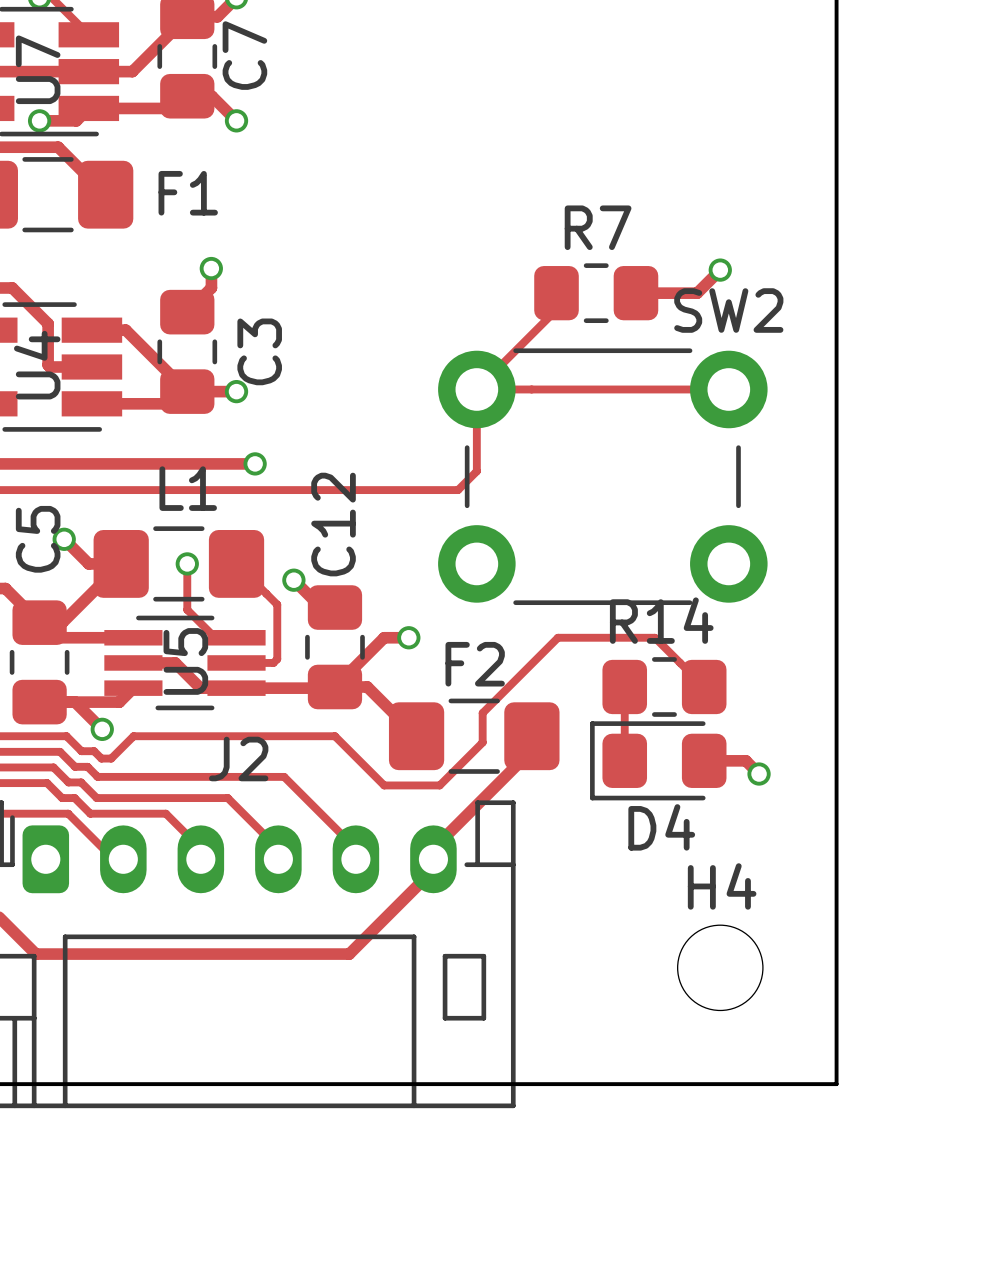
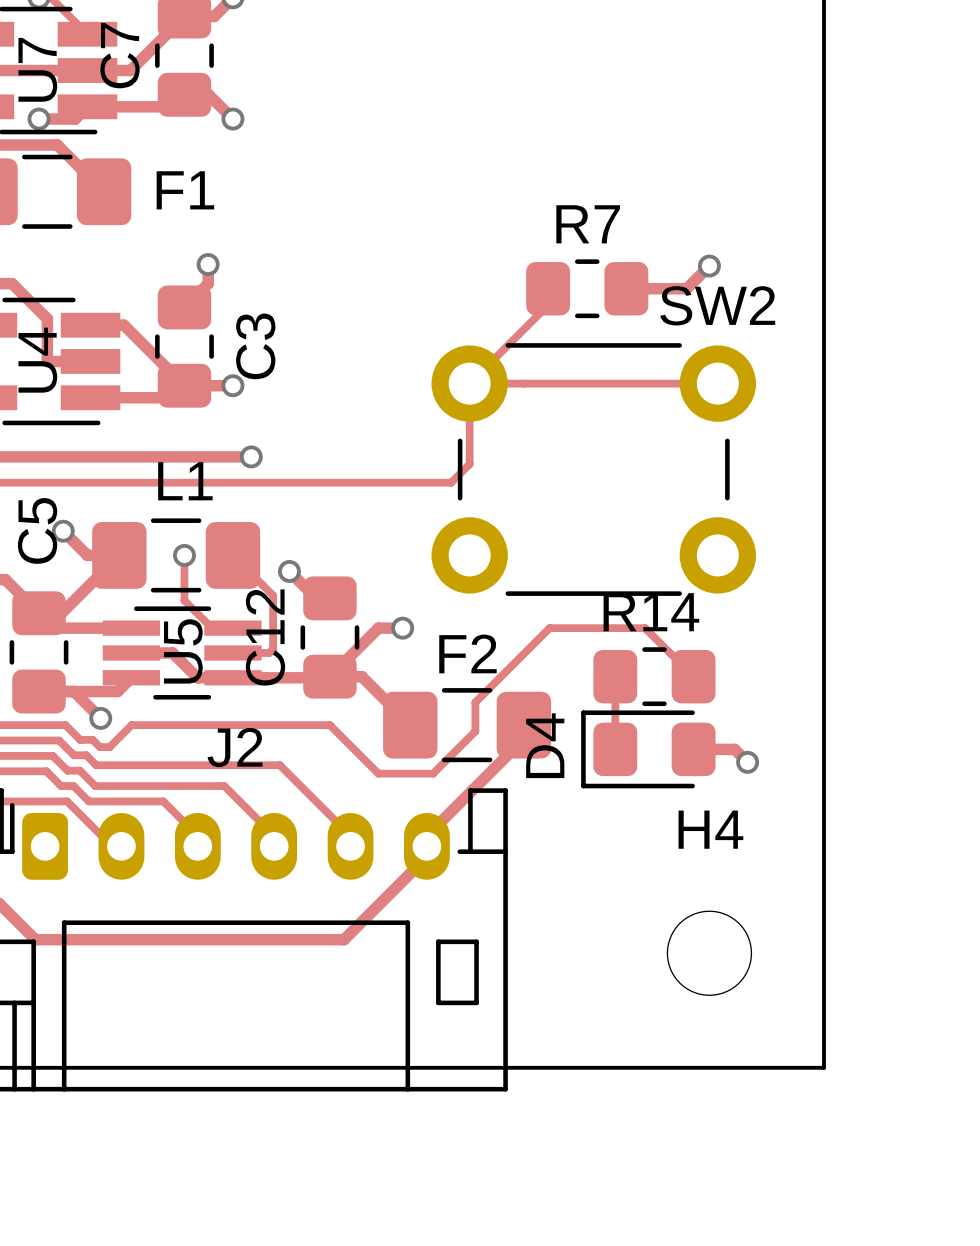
C7 name position: C7 (244, 55) -> C7 (120, 55)
C12 name position: C12 (333, 524) -> C12 (265, 637)
D4 name rotation: 0° (661, 827) -> 90° counterclockwise (545, 745)
D4 name position: D4 (661, 827) -> D4 (545, 745)
H4 name position: H4 (722, 886) -> H4 (710, 829)

